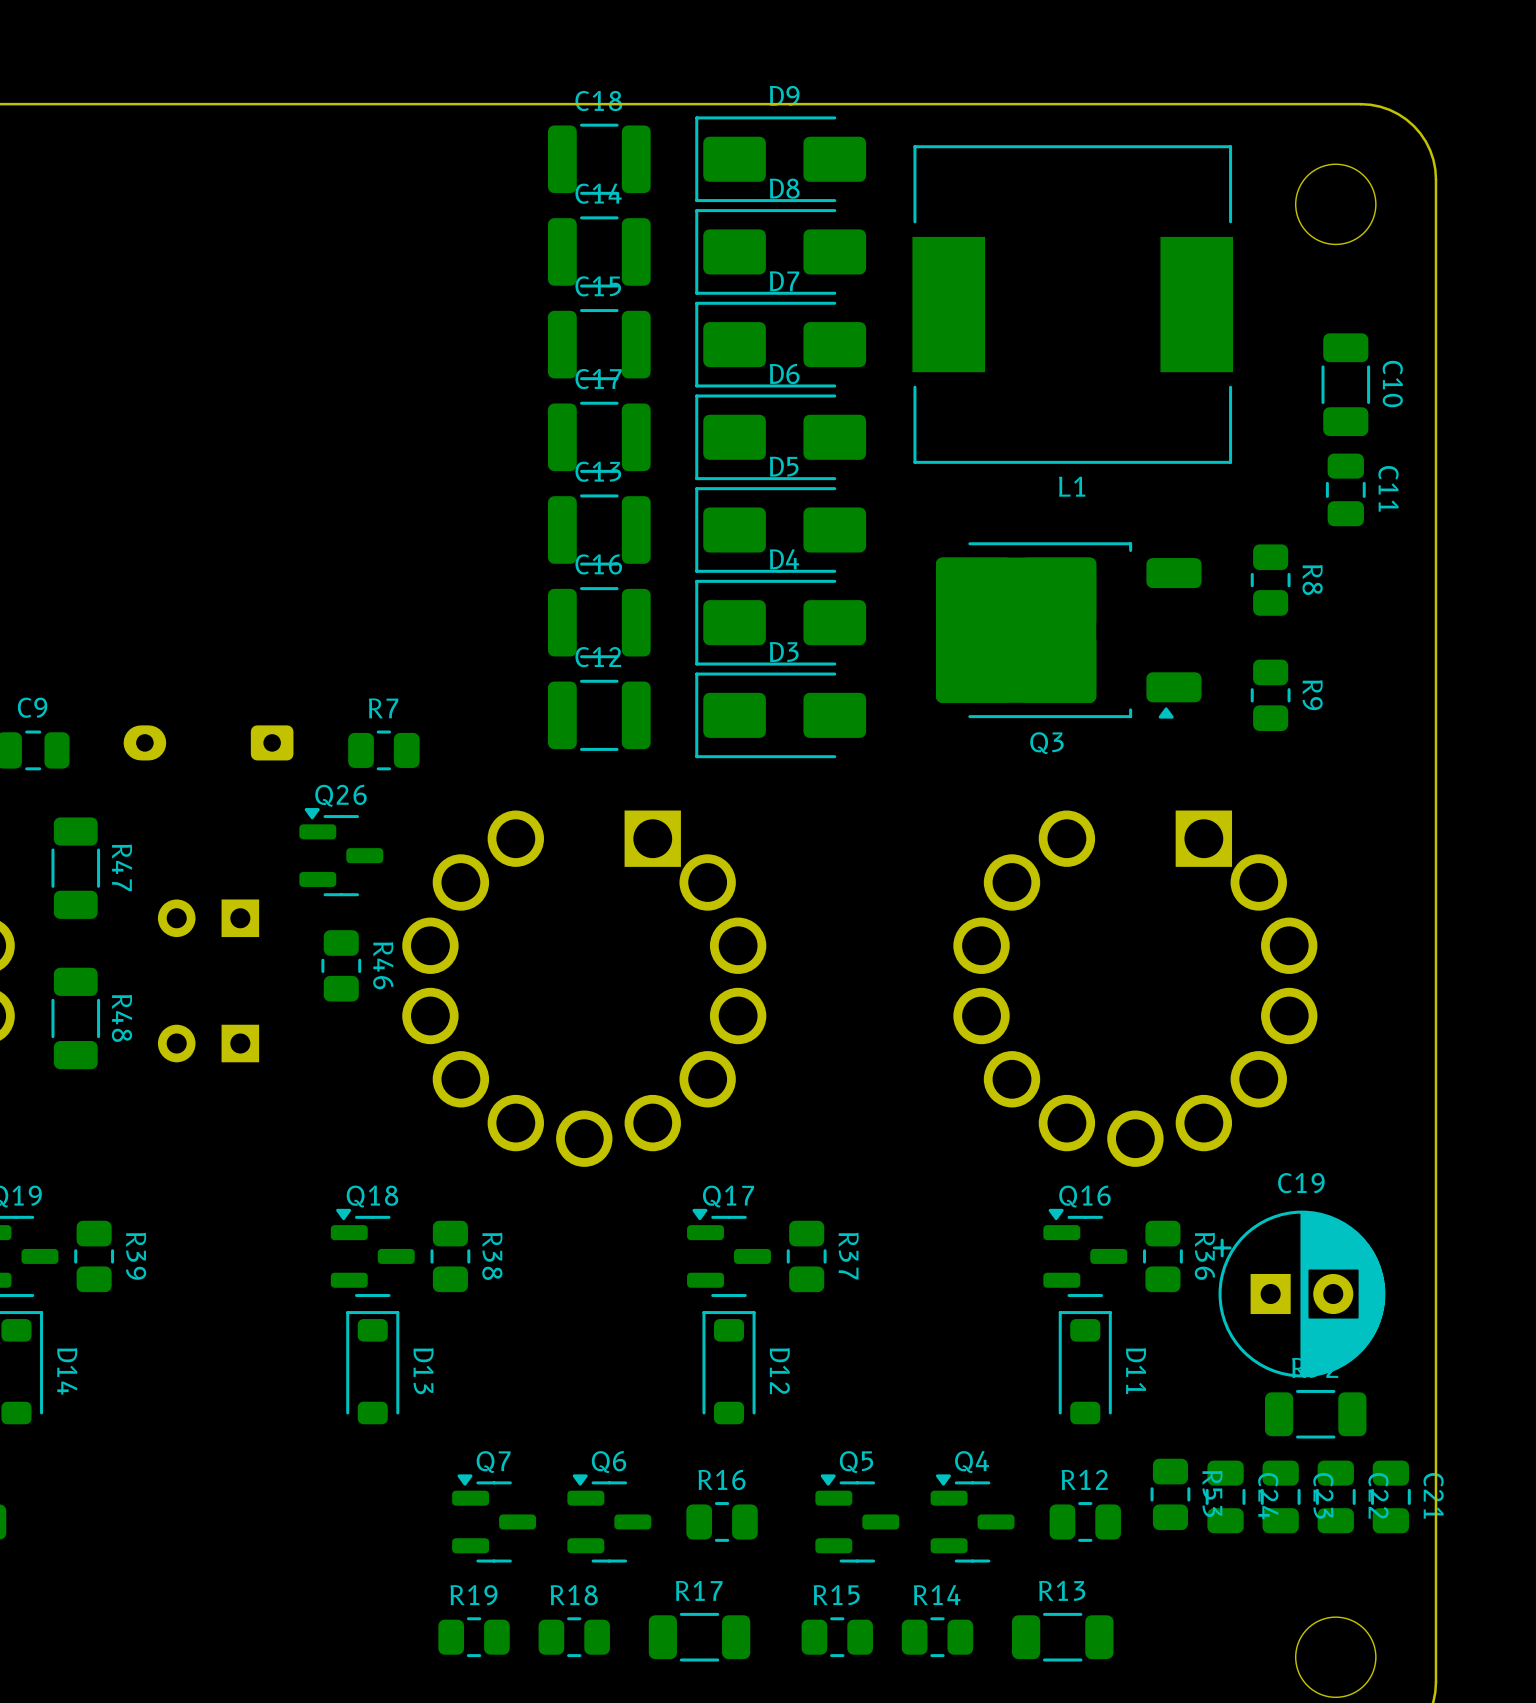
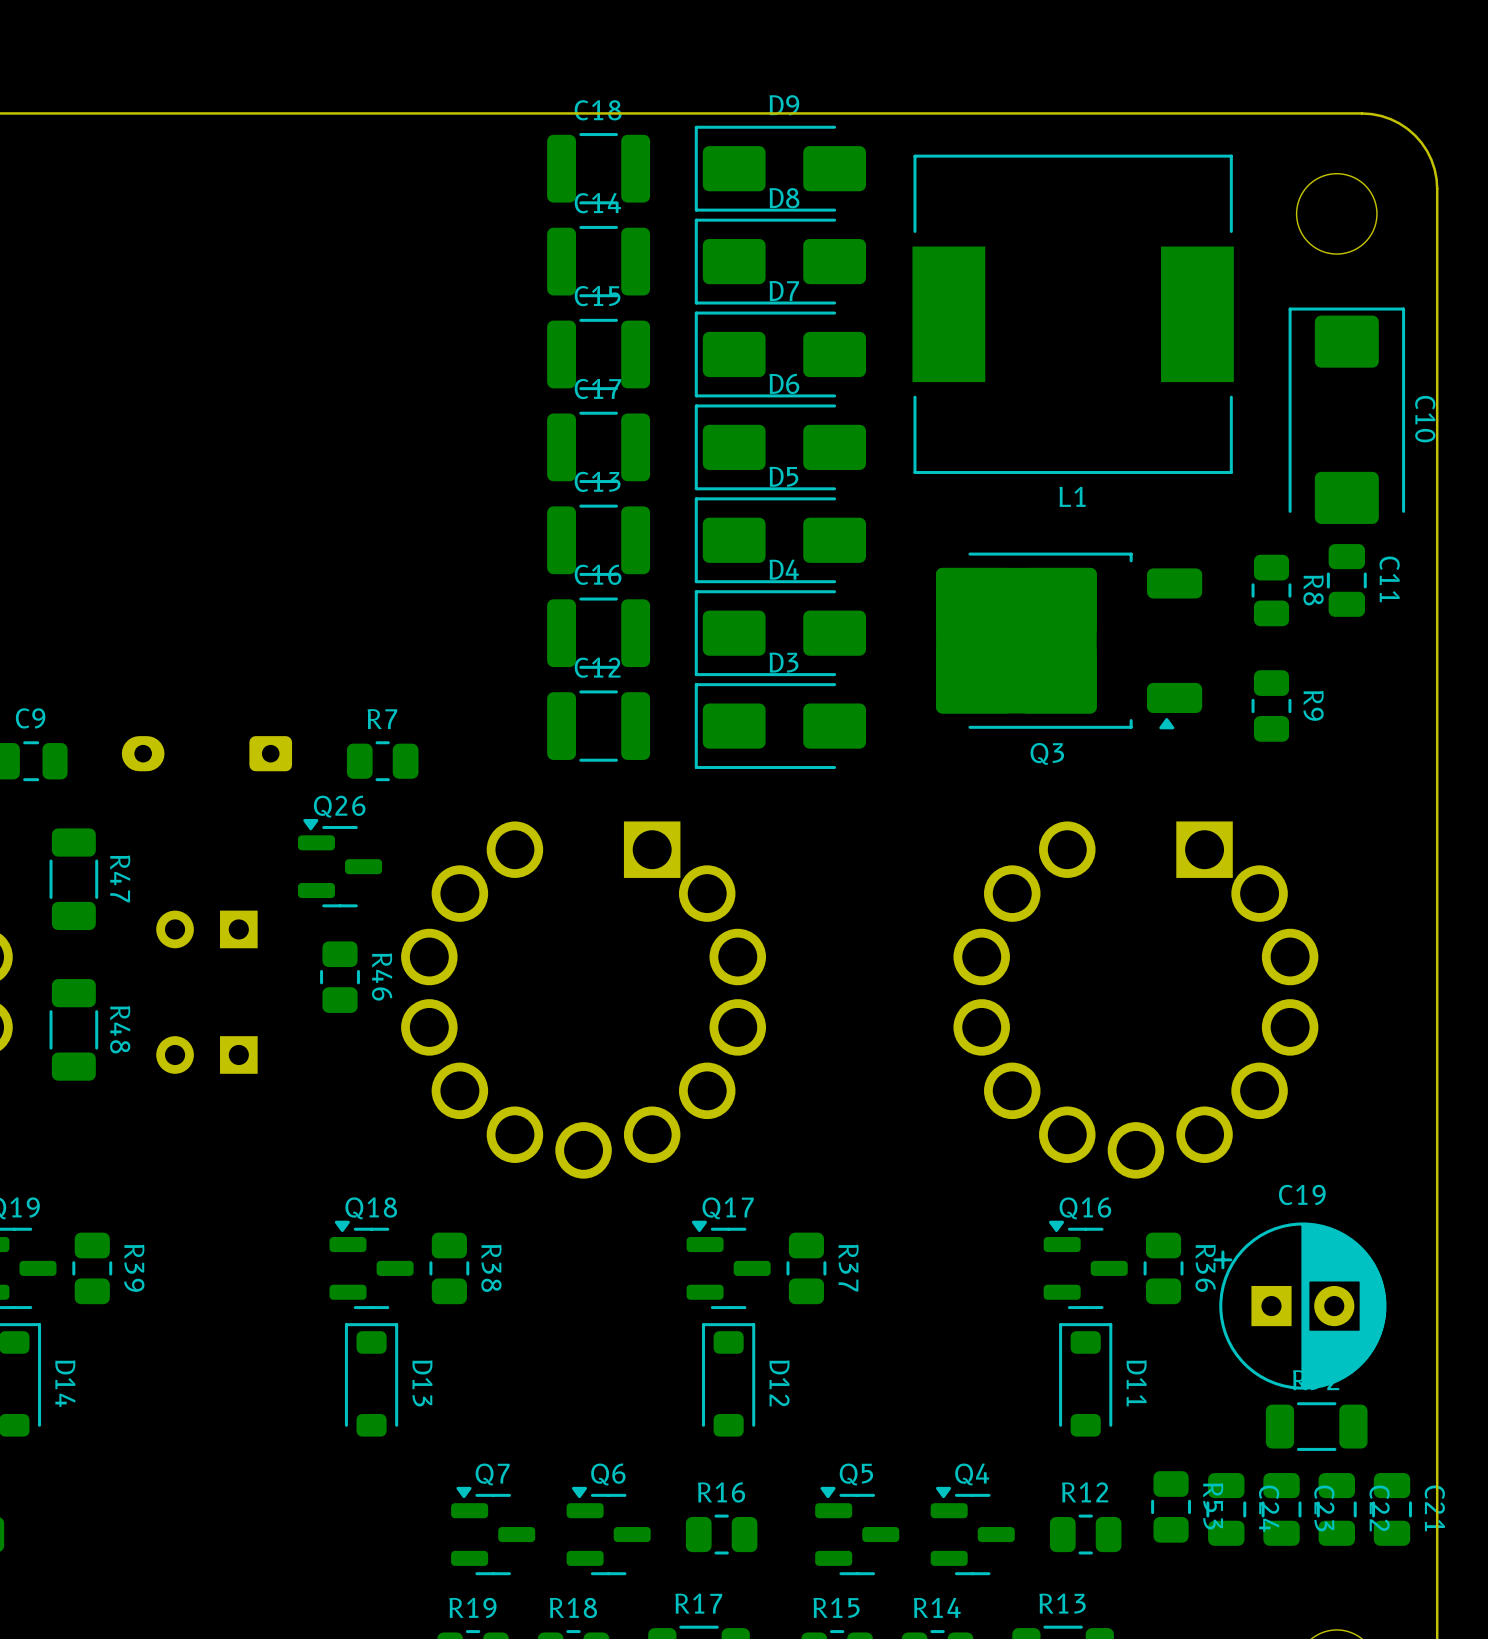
C10 footprint: [1321, 333, 1371, 437] -> [1288, 307, 1406, 524]
C11 position: (1345, 489) -> (1346, 580)

